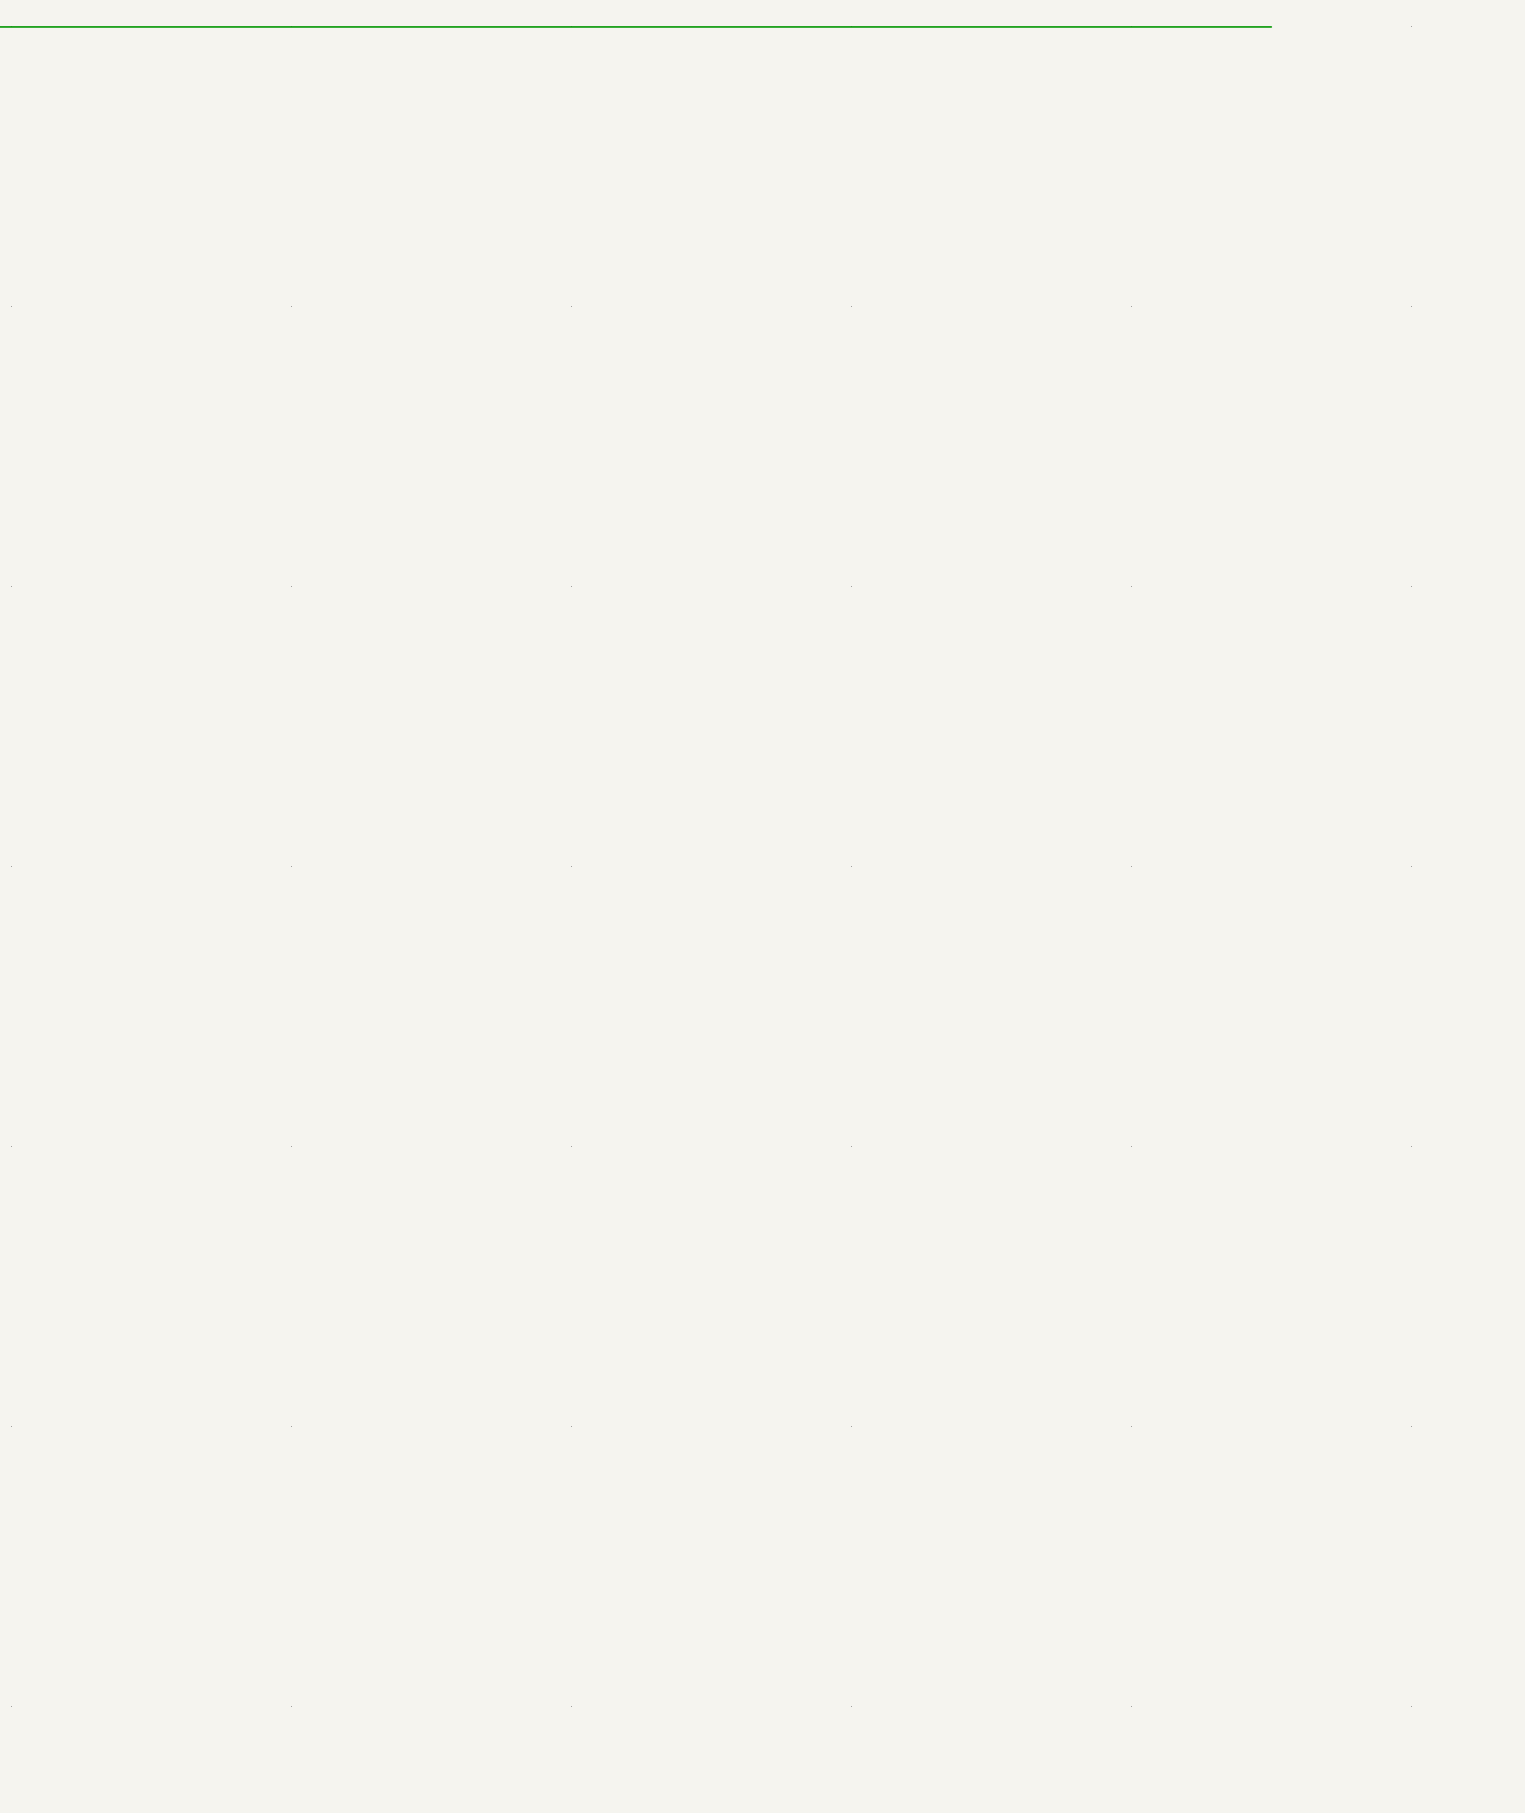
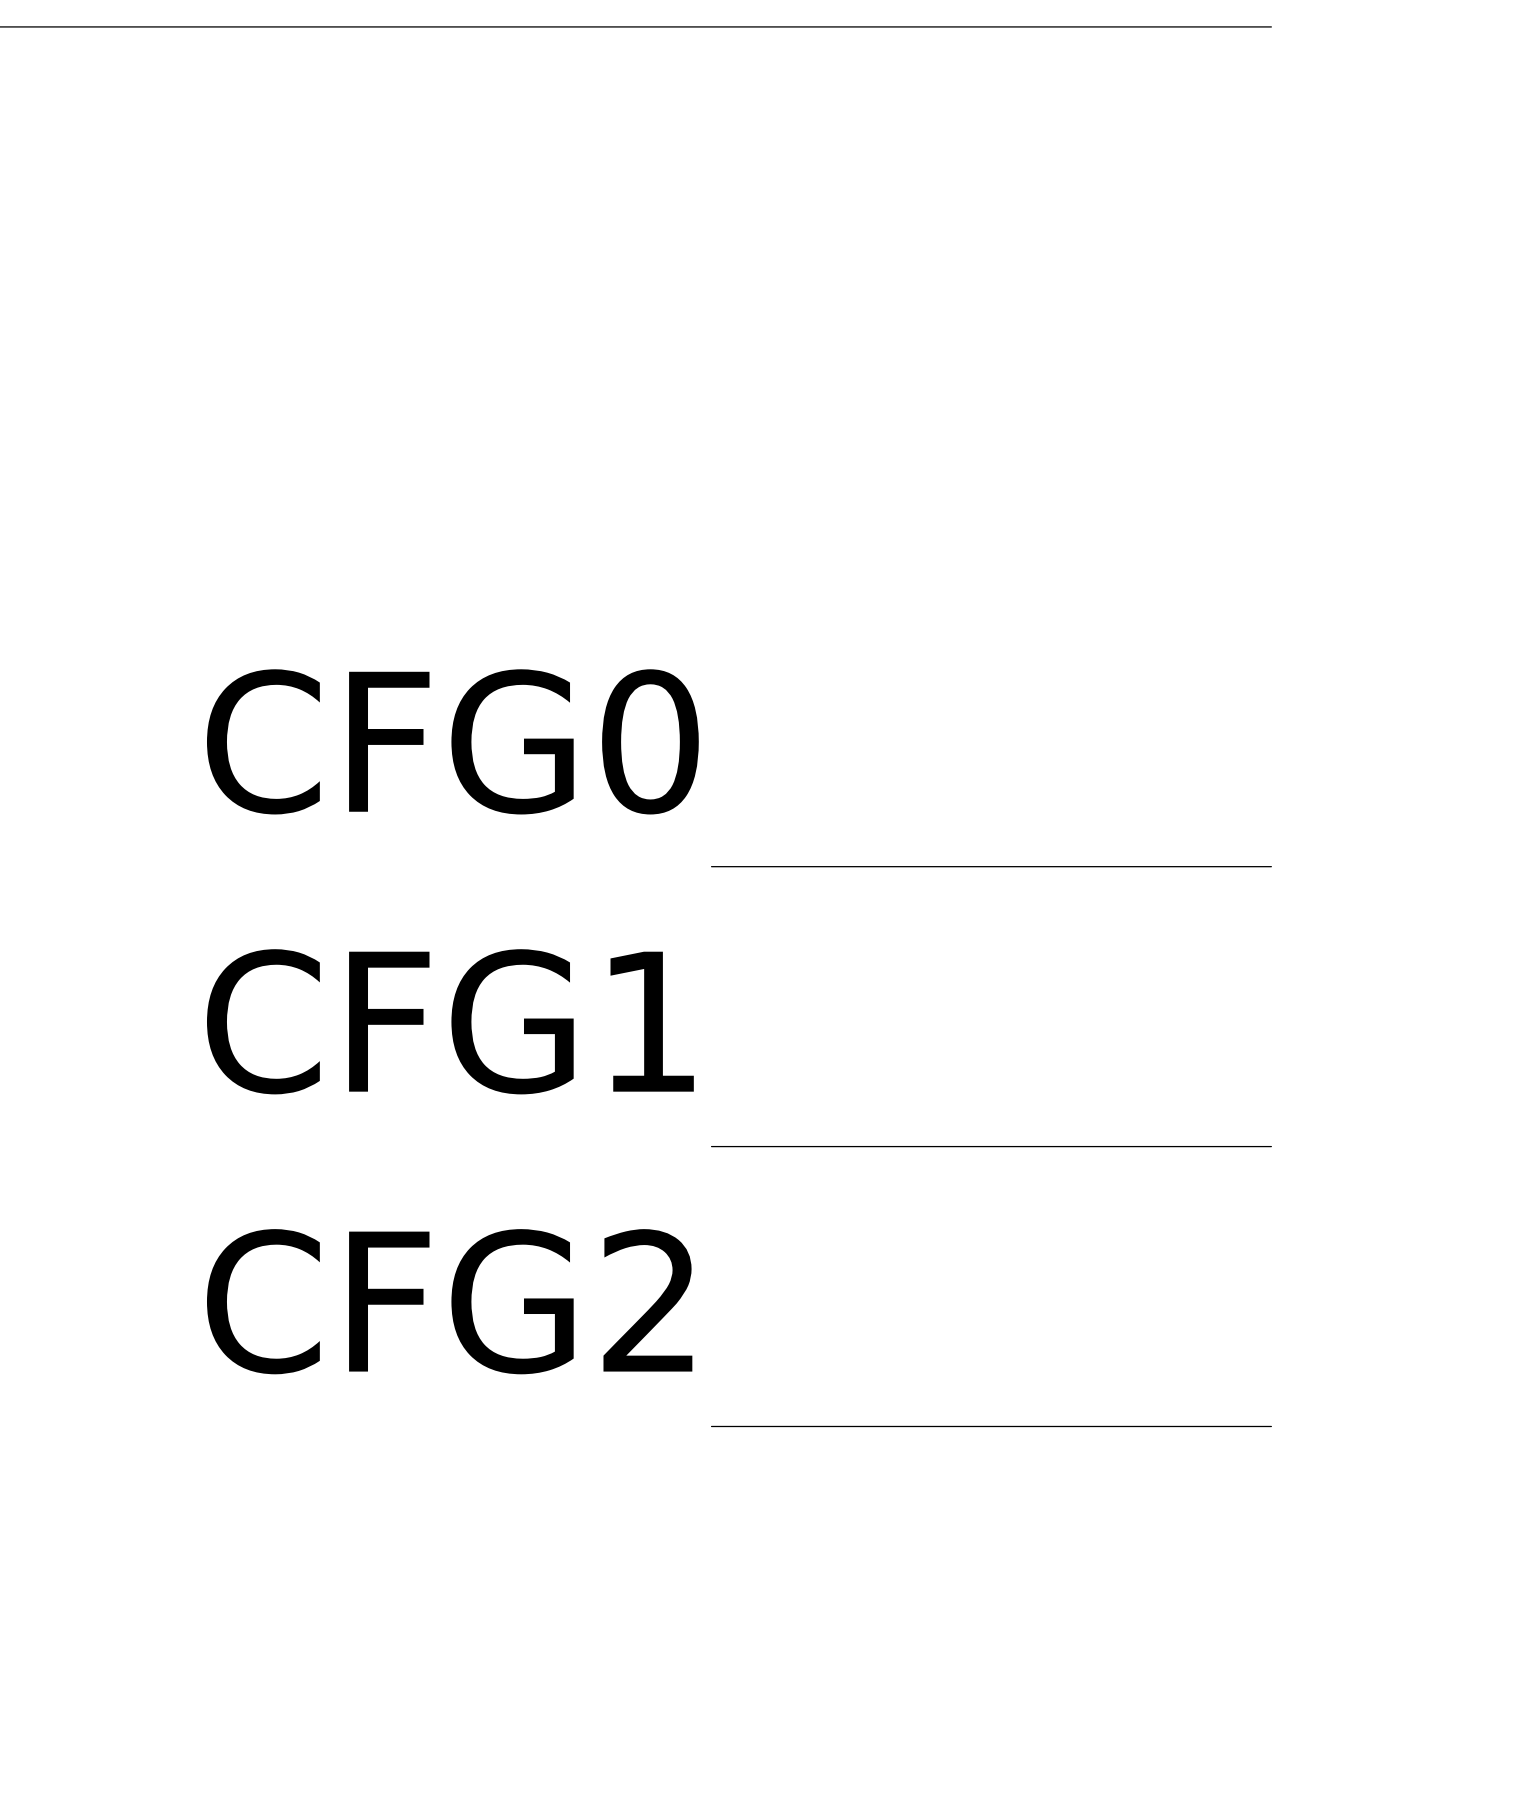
label: none -> CFG0 (452, 741)
wire: none -> (711, 866) (1271, 866)
label: none -> CFG1 (450, 1021)
wire: none -> (711, 1146) (1271, 1146)
label: none -> CFG2 (449, 1301)
wire: none -> (711, 1426) (1271, 1426)

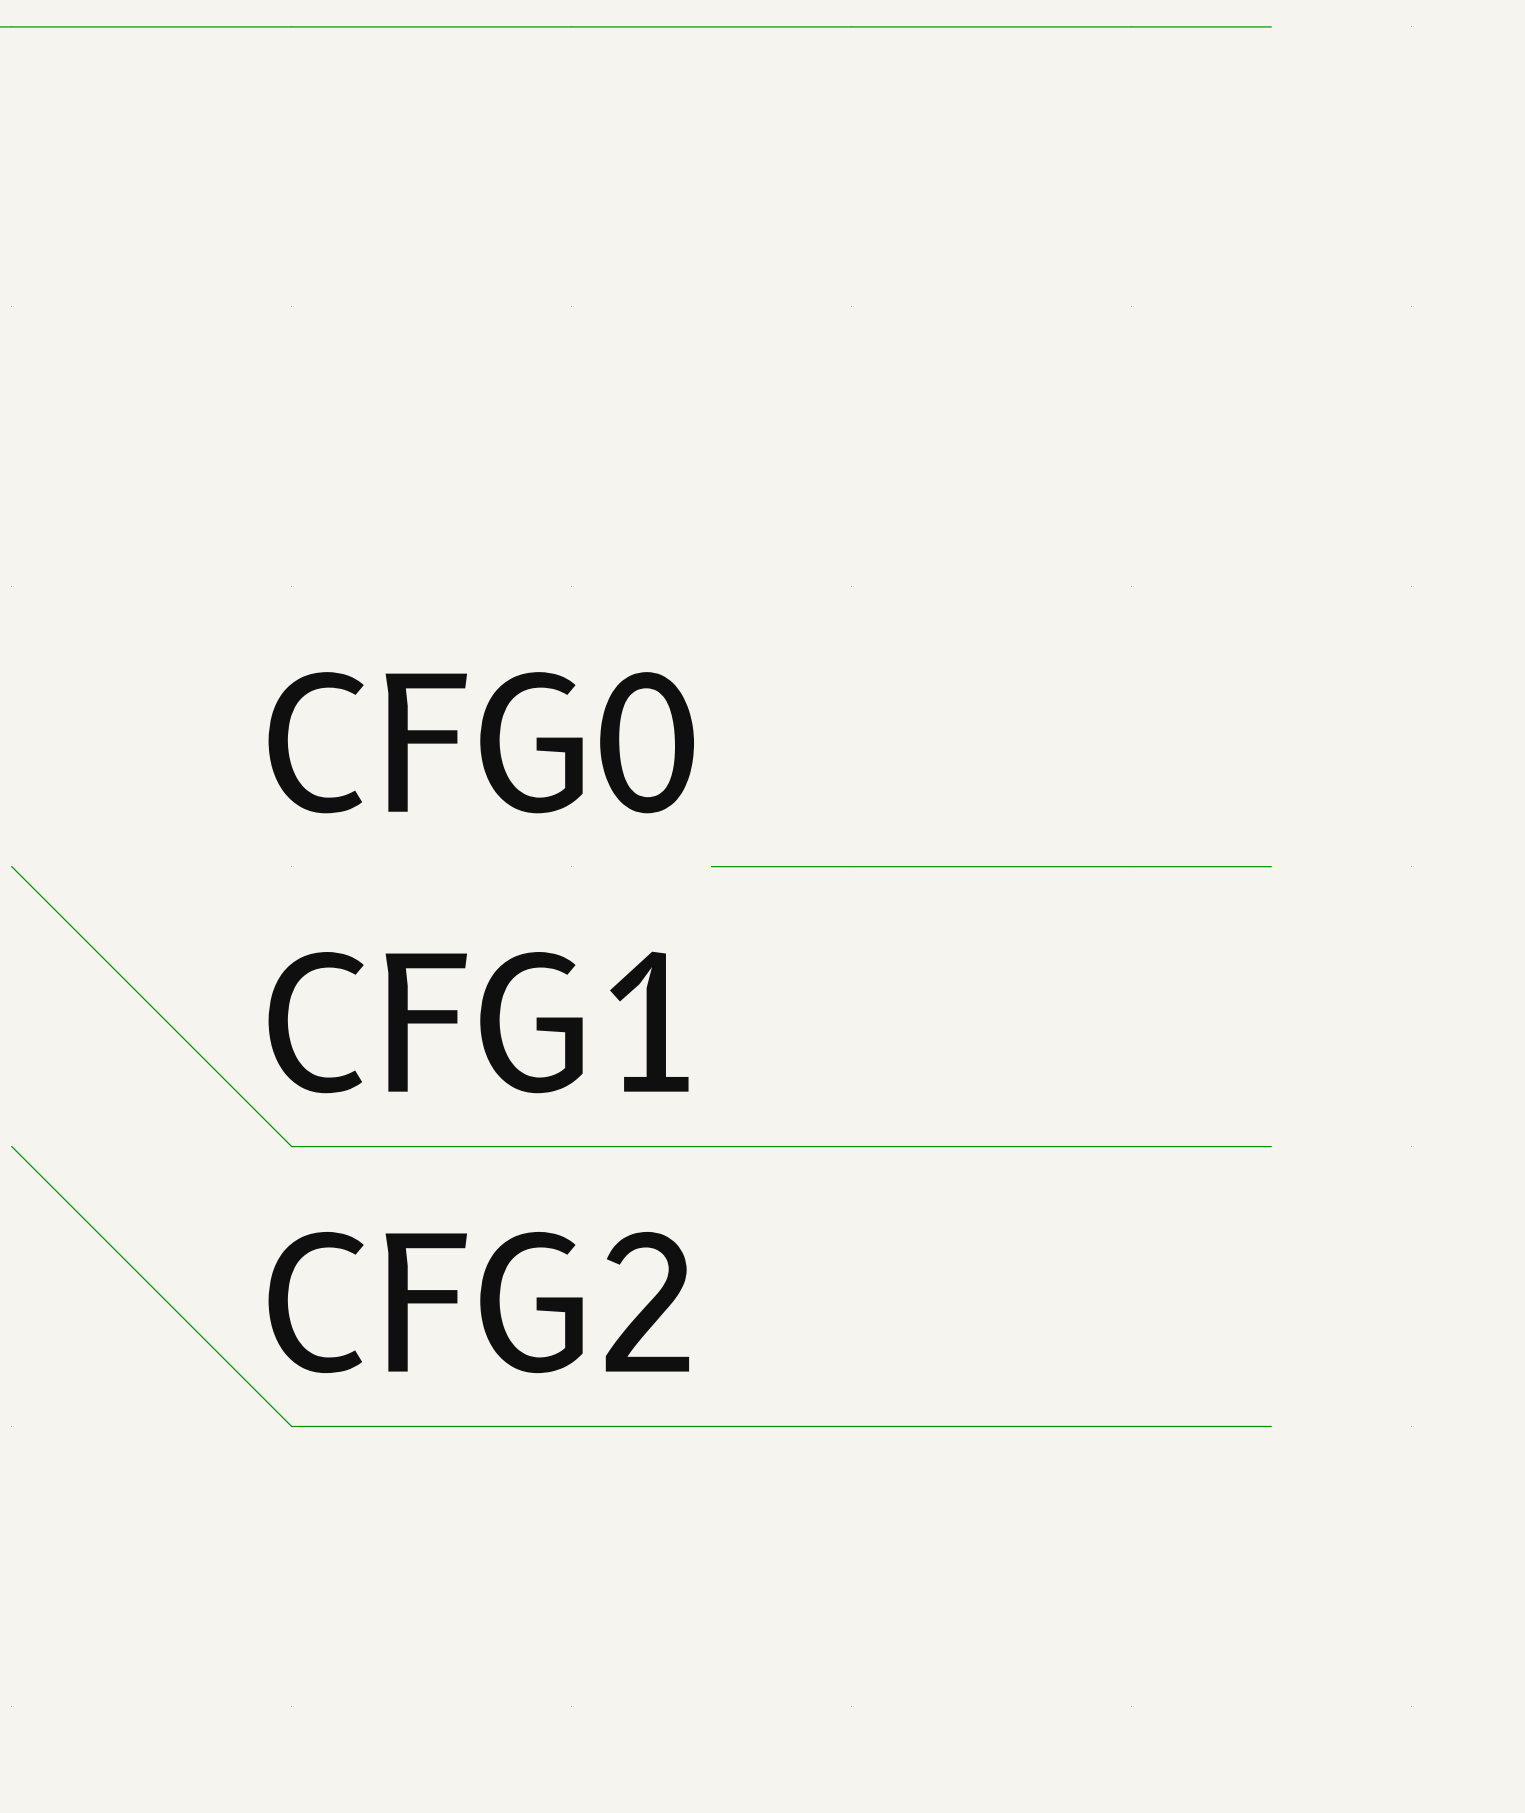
wire: none -> (11, 866) (291, 1146) (711, 1146)
wire: none -> (11, 1146) (291, 1426) (711, 1426)

